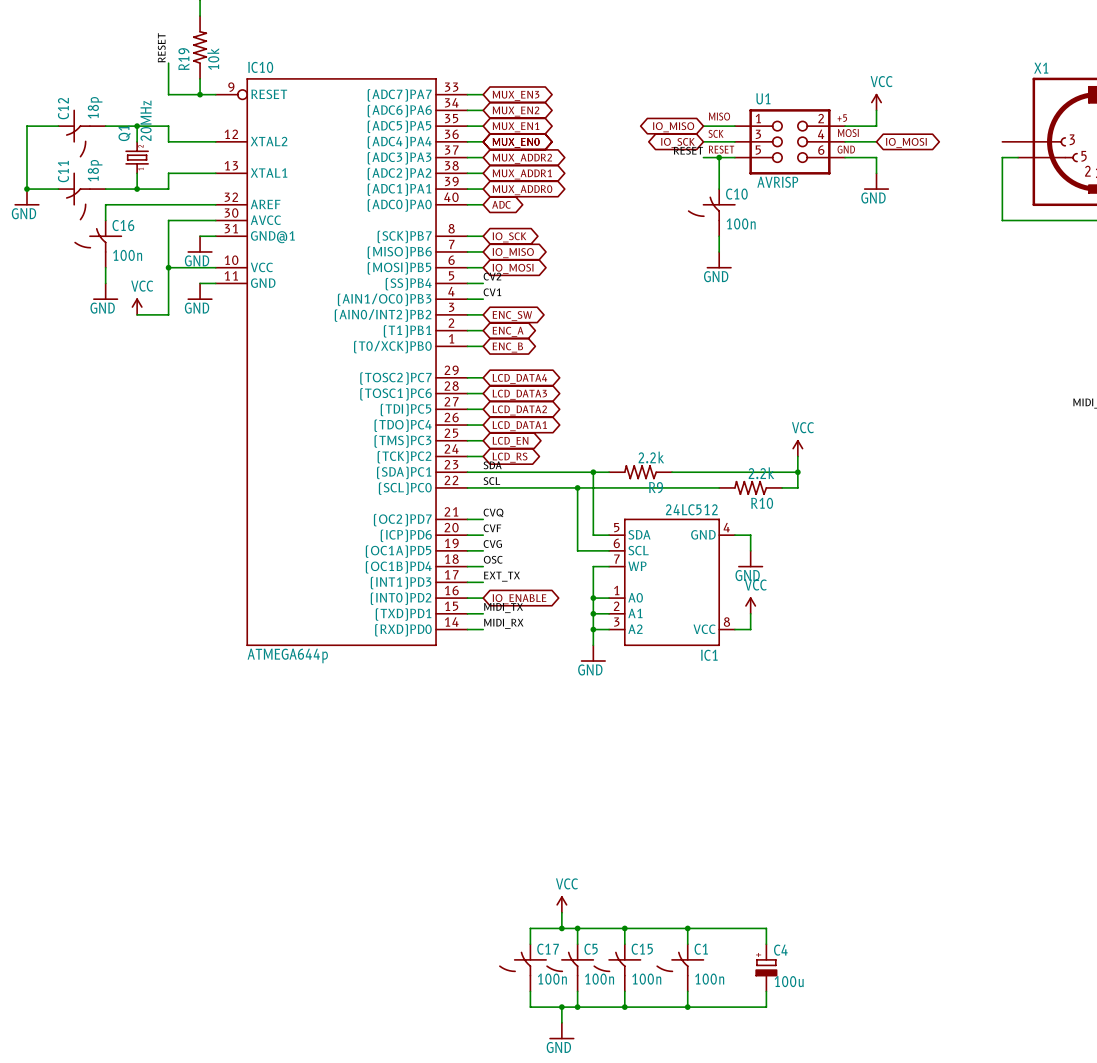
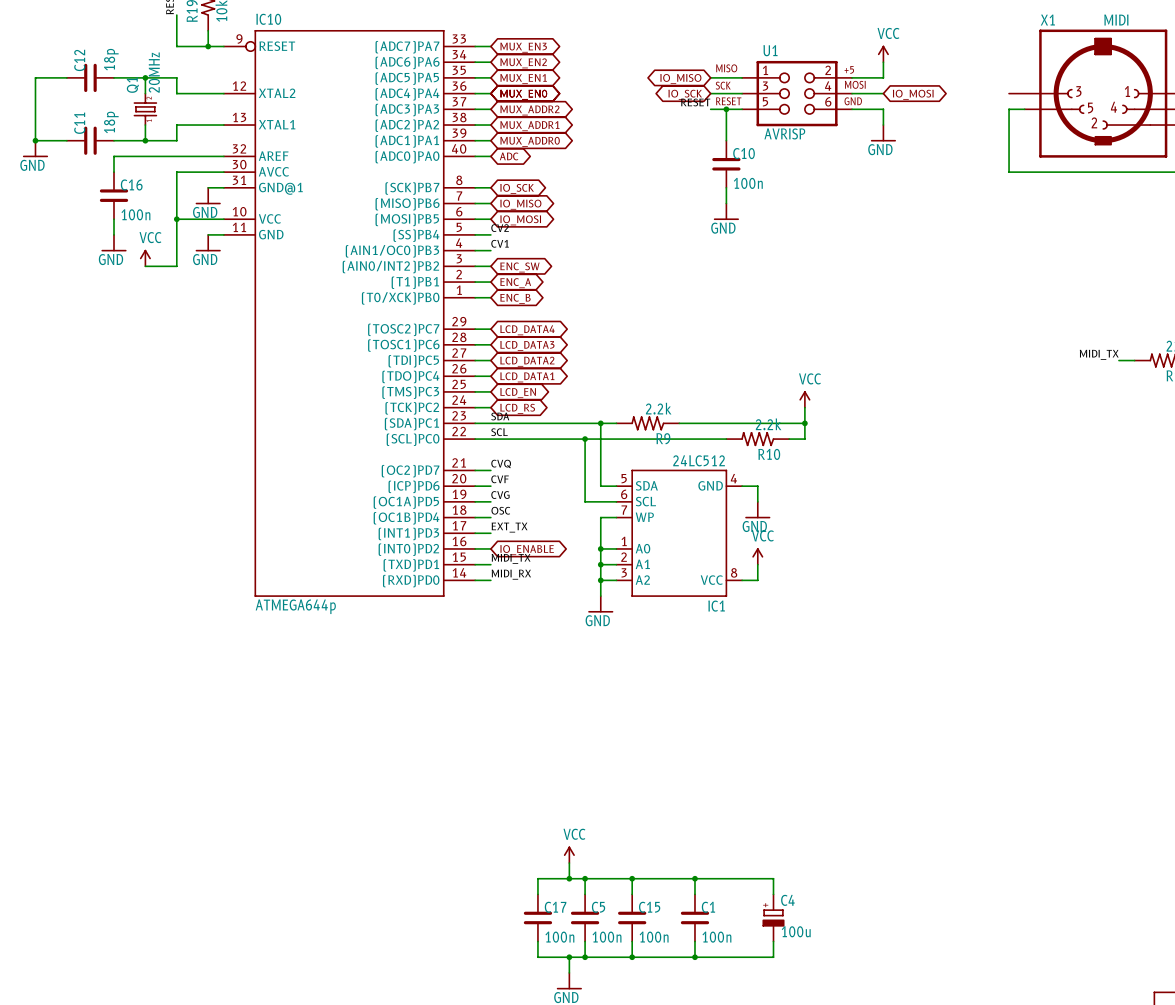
C12 symbol: [58, 109, 106, 158] -> [66, 63, 115, 93]
C11 symbol: [58, 172, 106, 221] -> [66, 126, 115, 155]
C10 symbol: [687, 189, 736, 237] -> [712, 140, 741, 188]
C16 symbol: [74, 220, 123, 268] -> [99, 172, 129, 220]
C17 symbol: [499, 944, 547, 992] -> [523, 894, 553, 942]
C5 symbol: [546, 944, 595, 992] -> [570, 894, 600, 942]
C15 symbol: [593, 944, 642, 992] -> [618, 894, 647, 942]
C1 symbol: [656, 944, 705, 992] -> [680, 894, 710, 942]

